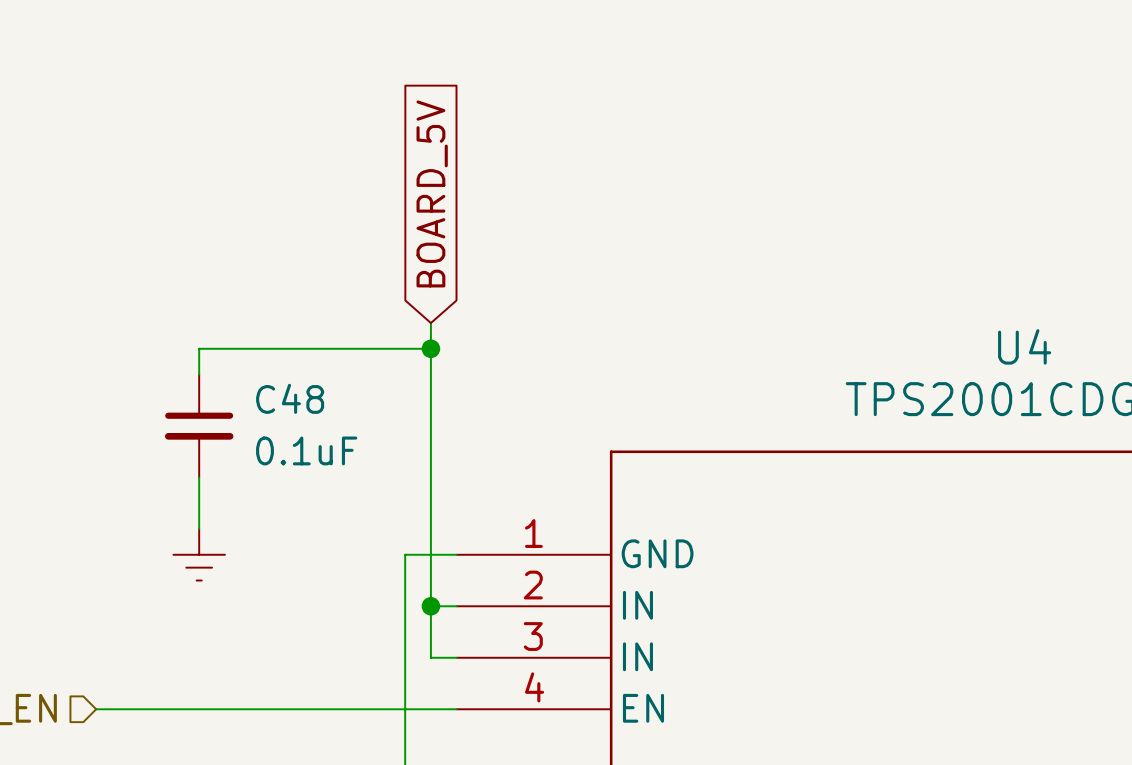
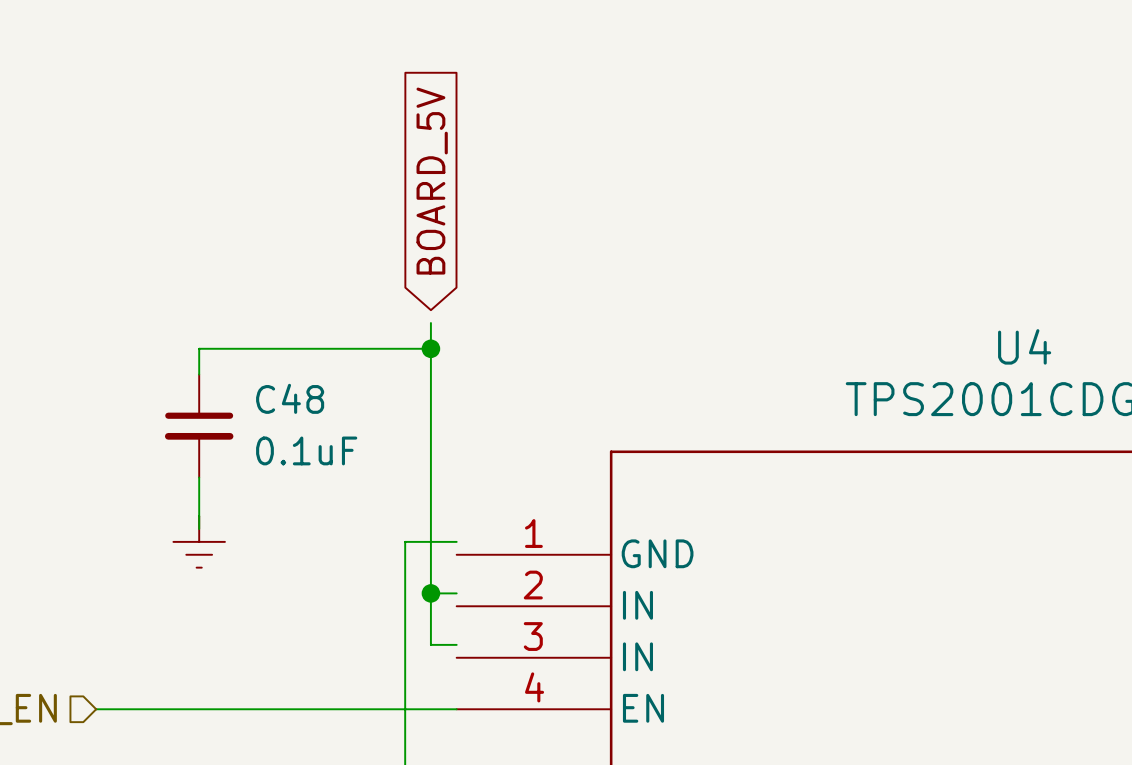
global label position: BOARD_5V (432, 193) -> BOARD_5V (432, 181)
power symbol position: (199, 554) -> (199, 541)
wire: (405, 554) (456, 554) -> (405, 554) (405, 541) (456, 541)
wire: (430, 606) (456, 606) -> (430, 593) (456, 593)
junction position: (430, 606) -> (430, 593)
wire: (430, 644) (430, 657) (456, 657) -> (430, 644) (456, 644)

